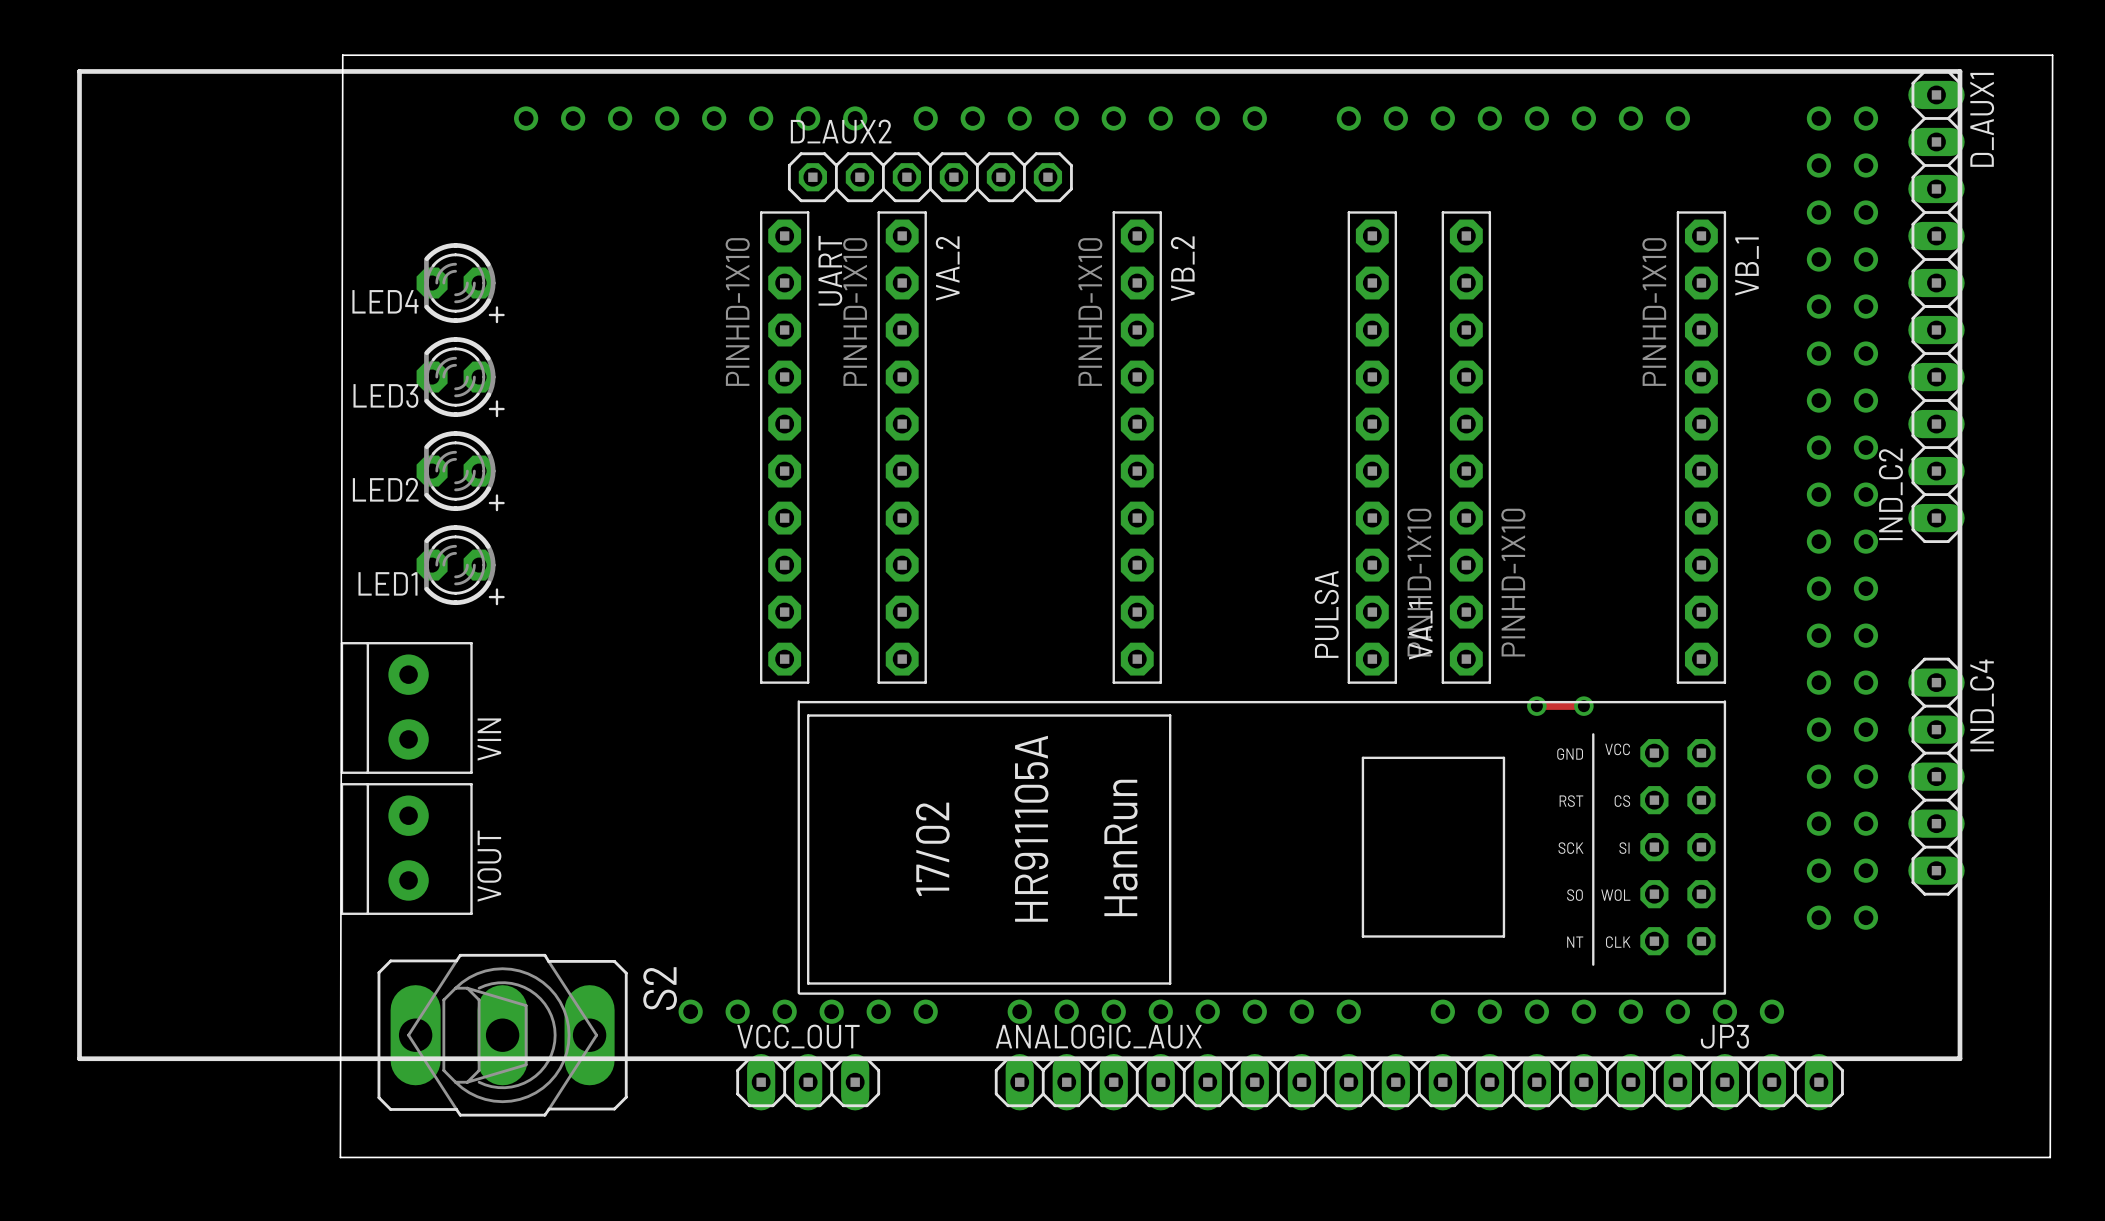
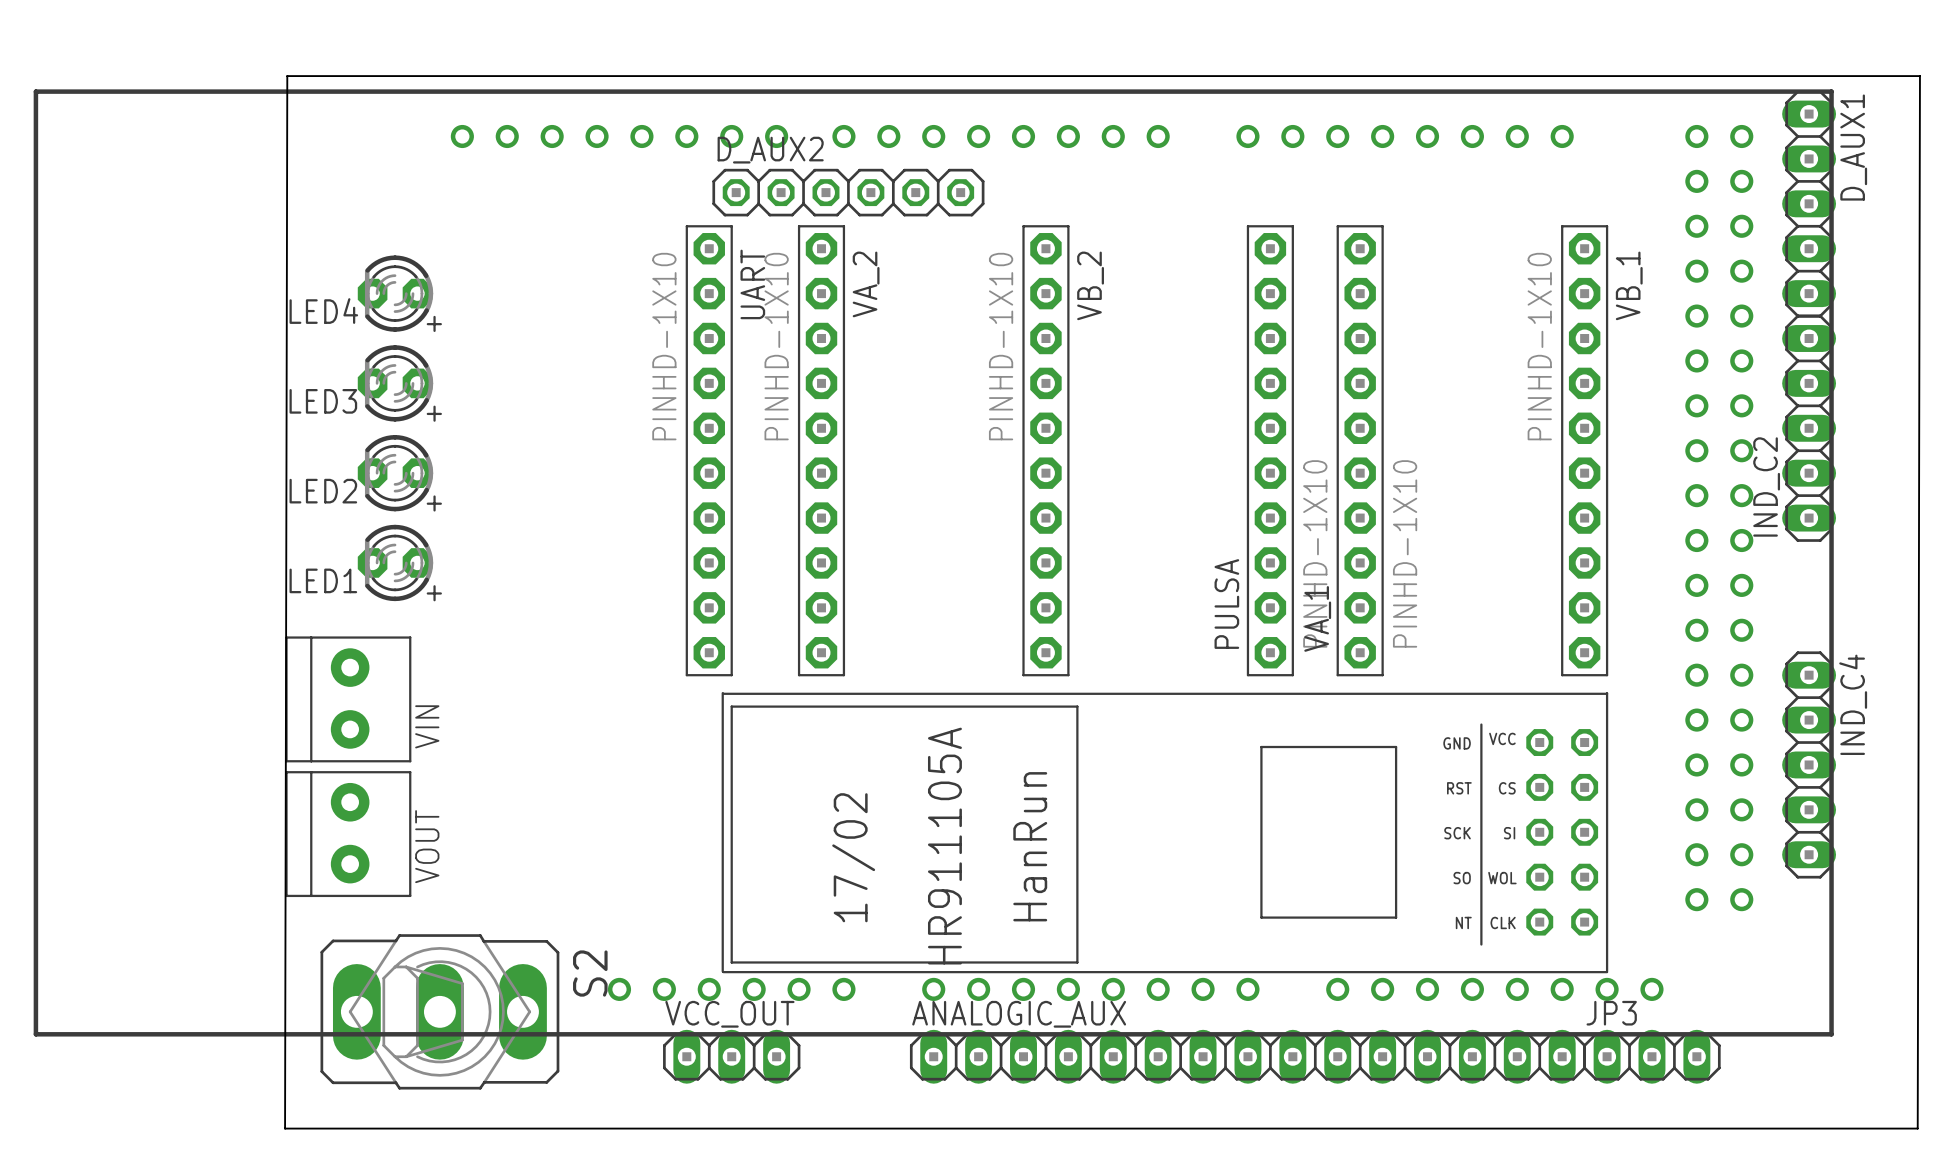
track: (1536, 706) (1583, 706) -> none
via: (1536, 706) -> none
via: (1583, 706) -> none

